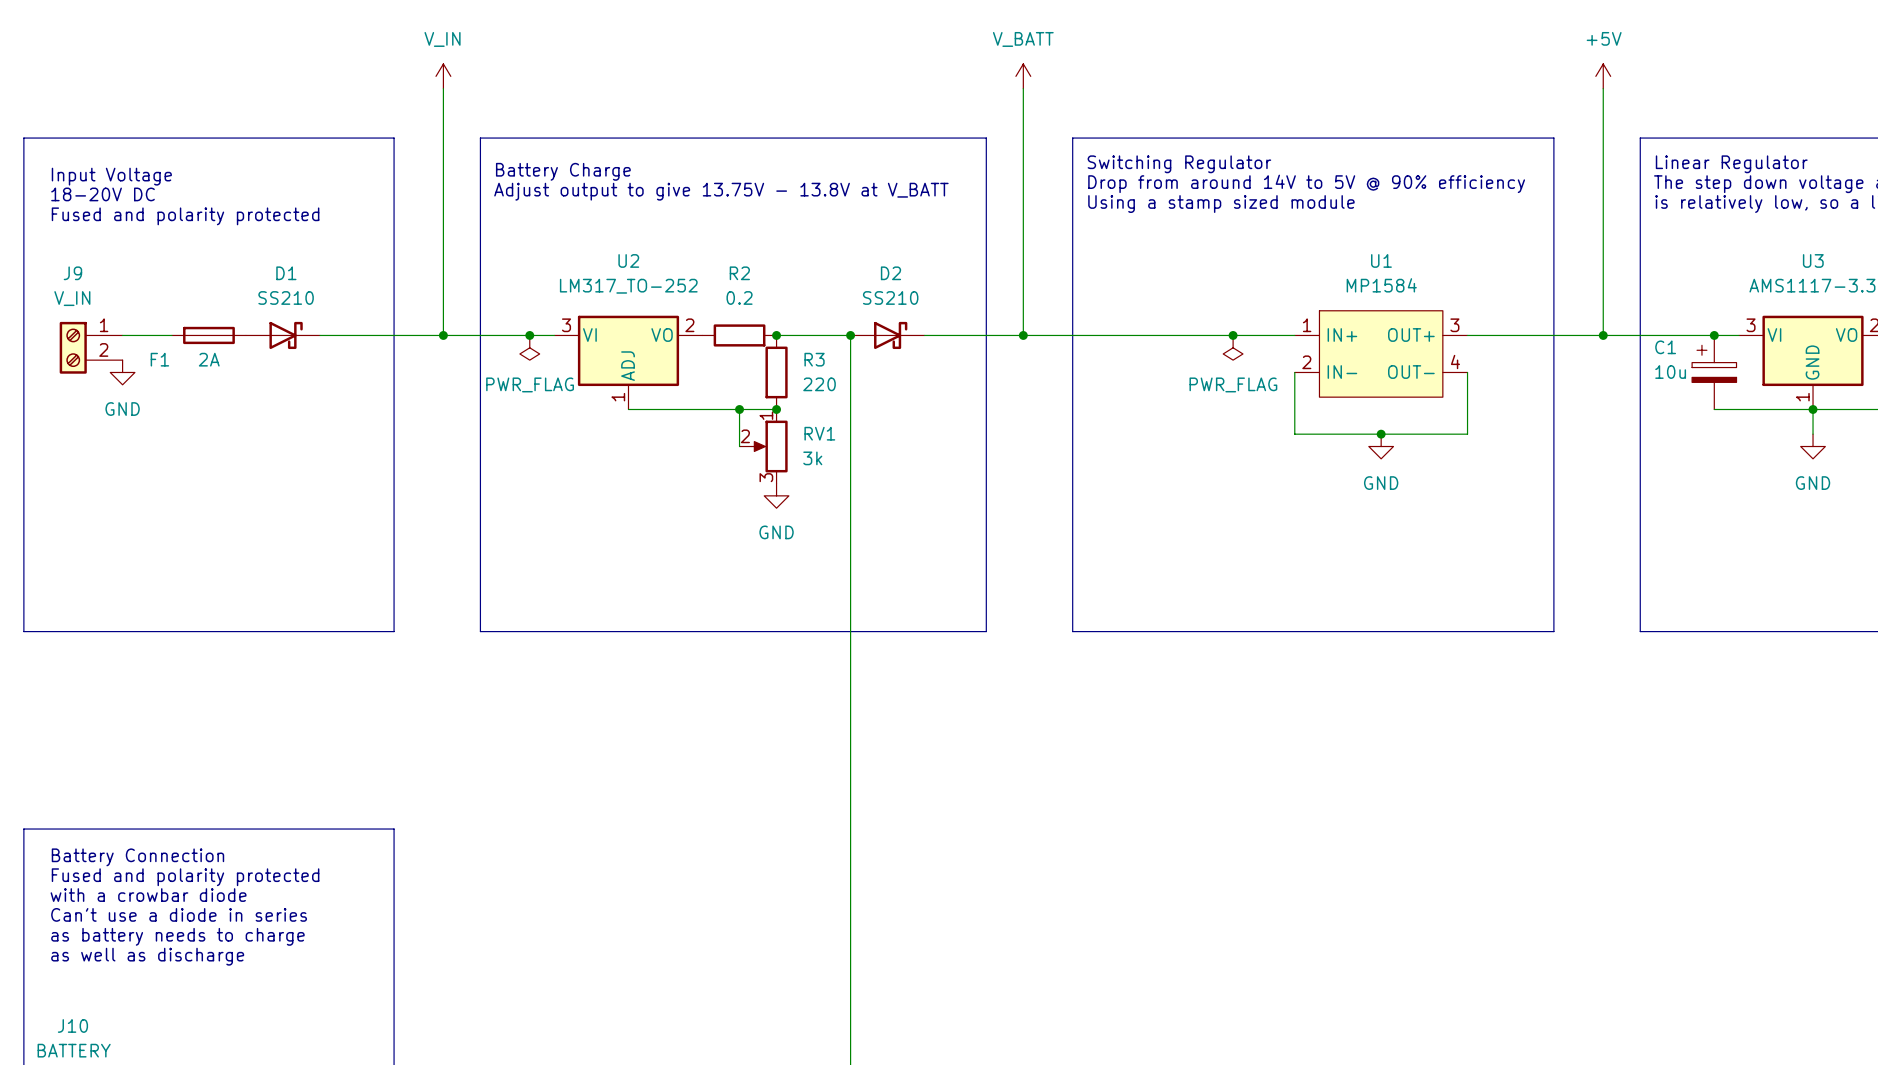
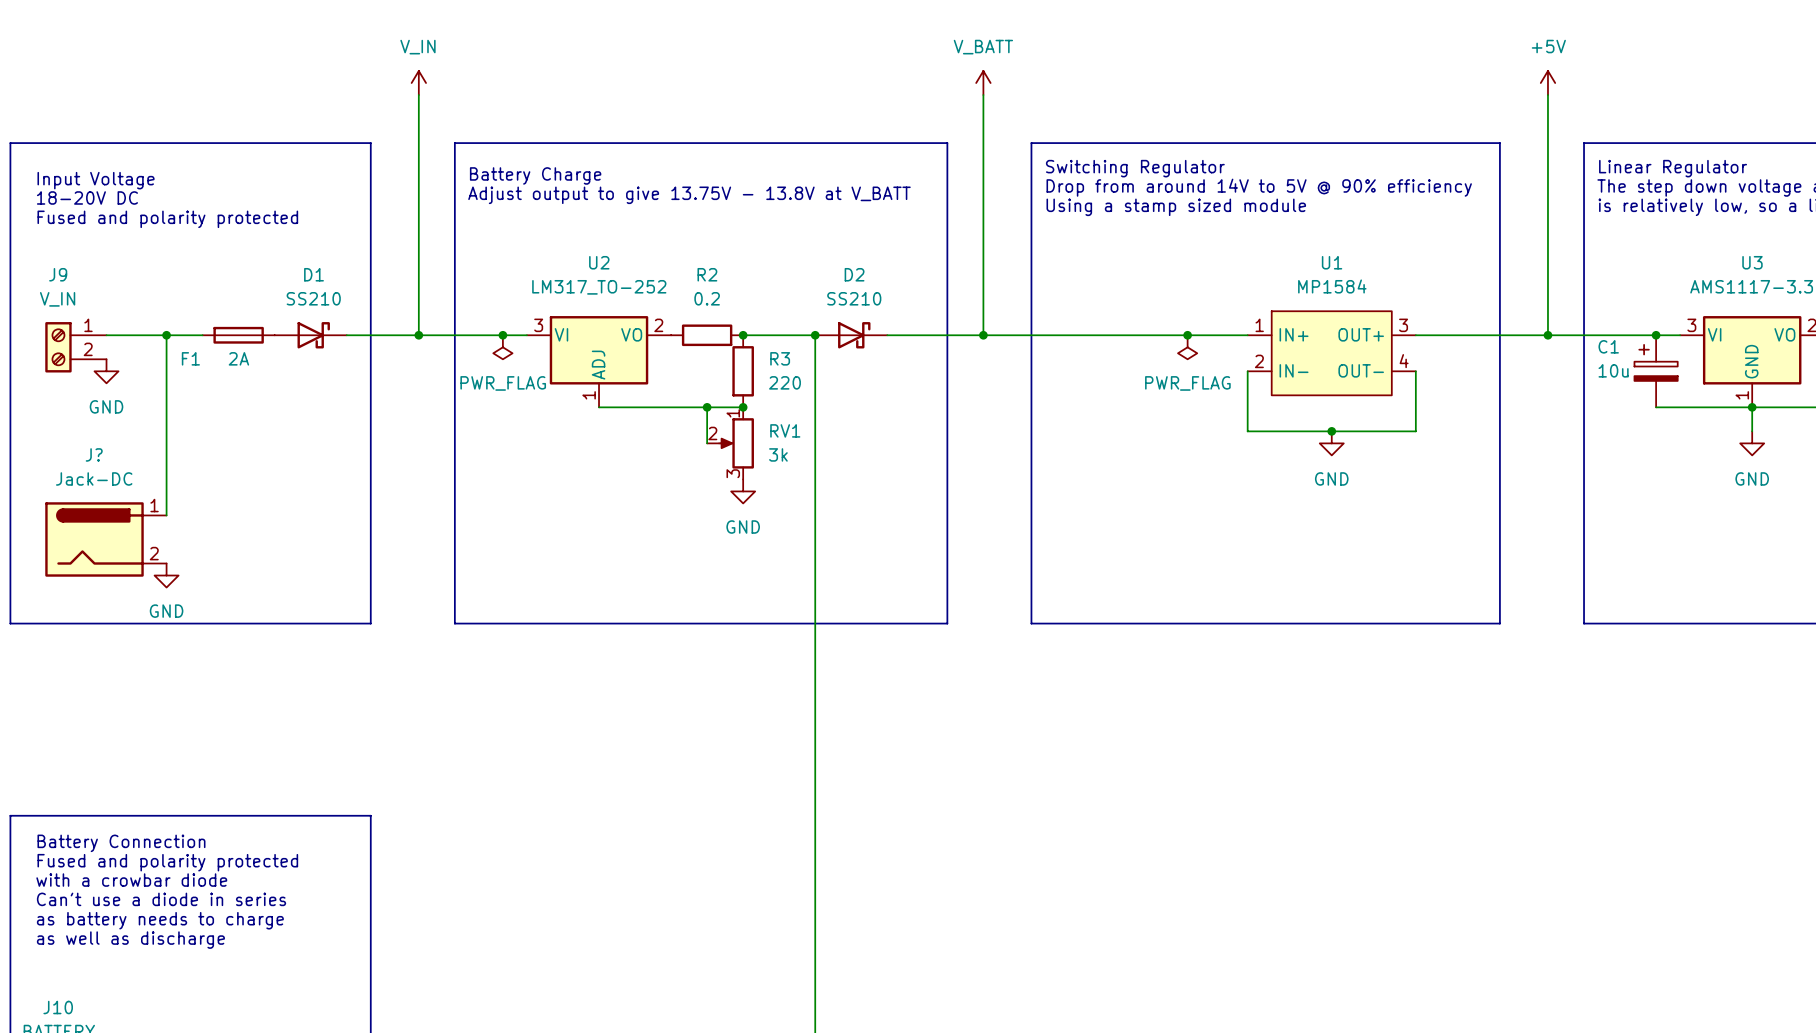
wire: none -> (166, 335) (166, 515)
junction: none -> (166, 335)
F1 position: (208, 335) -> (238, 335)
D1 position: (283, 335) -> (310, 335)
J?: none -> Jack-DC (105, 539)
power symbol: none -> GND (166, 575)

